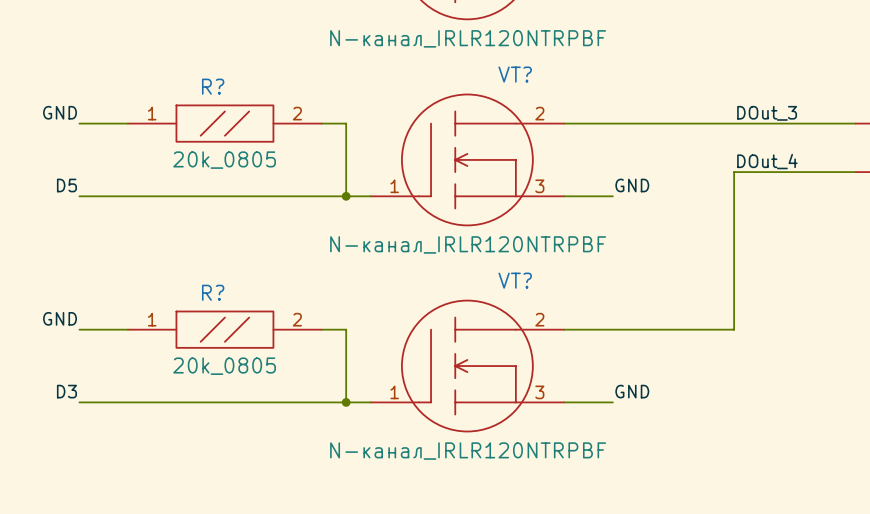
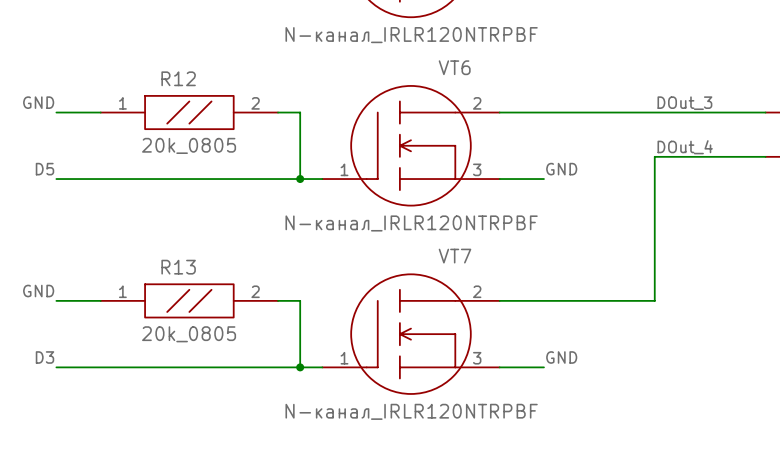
VT? name: VT? (515, 74) -> VT6 (454, 67)
R? name: R? (213, 86) -> R12 (178, 78)
VT? name: VT? (515, 280) -> VT7 (454, 256)
R? name: R? (213, 292) -> R13 (178, 267)

